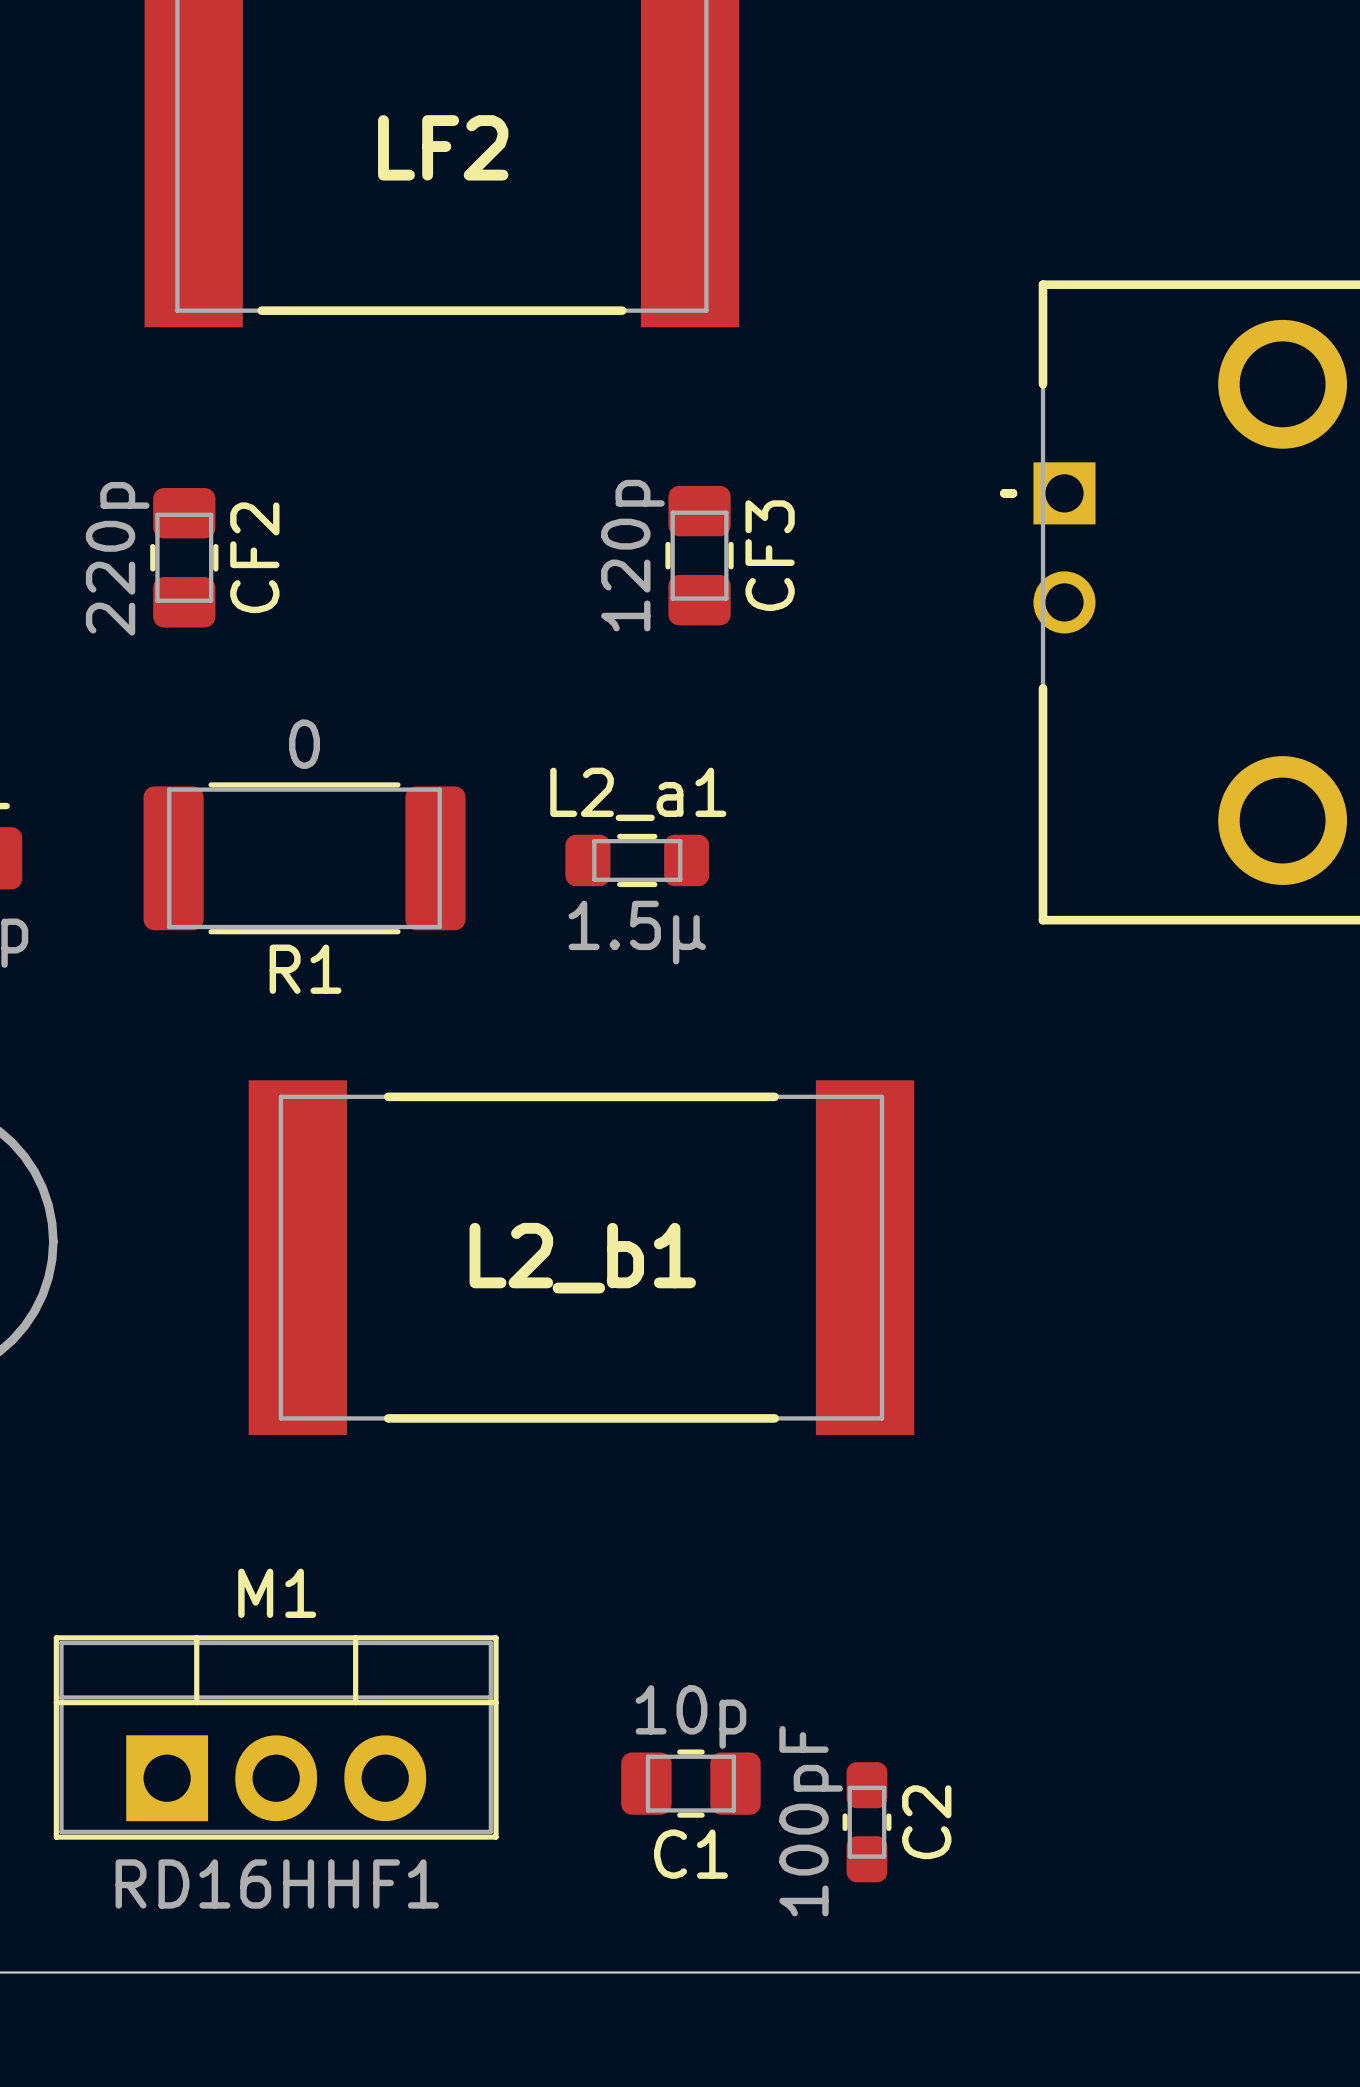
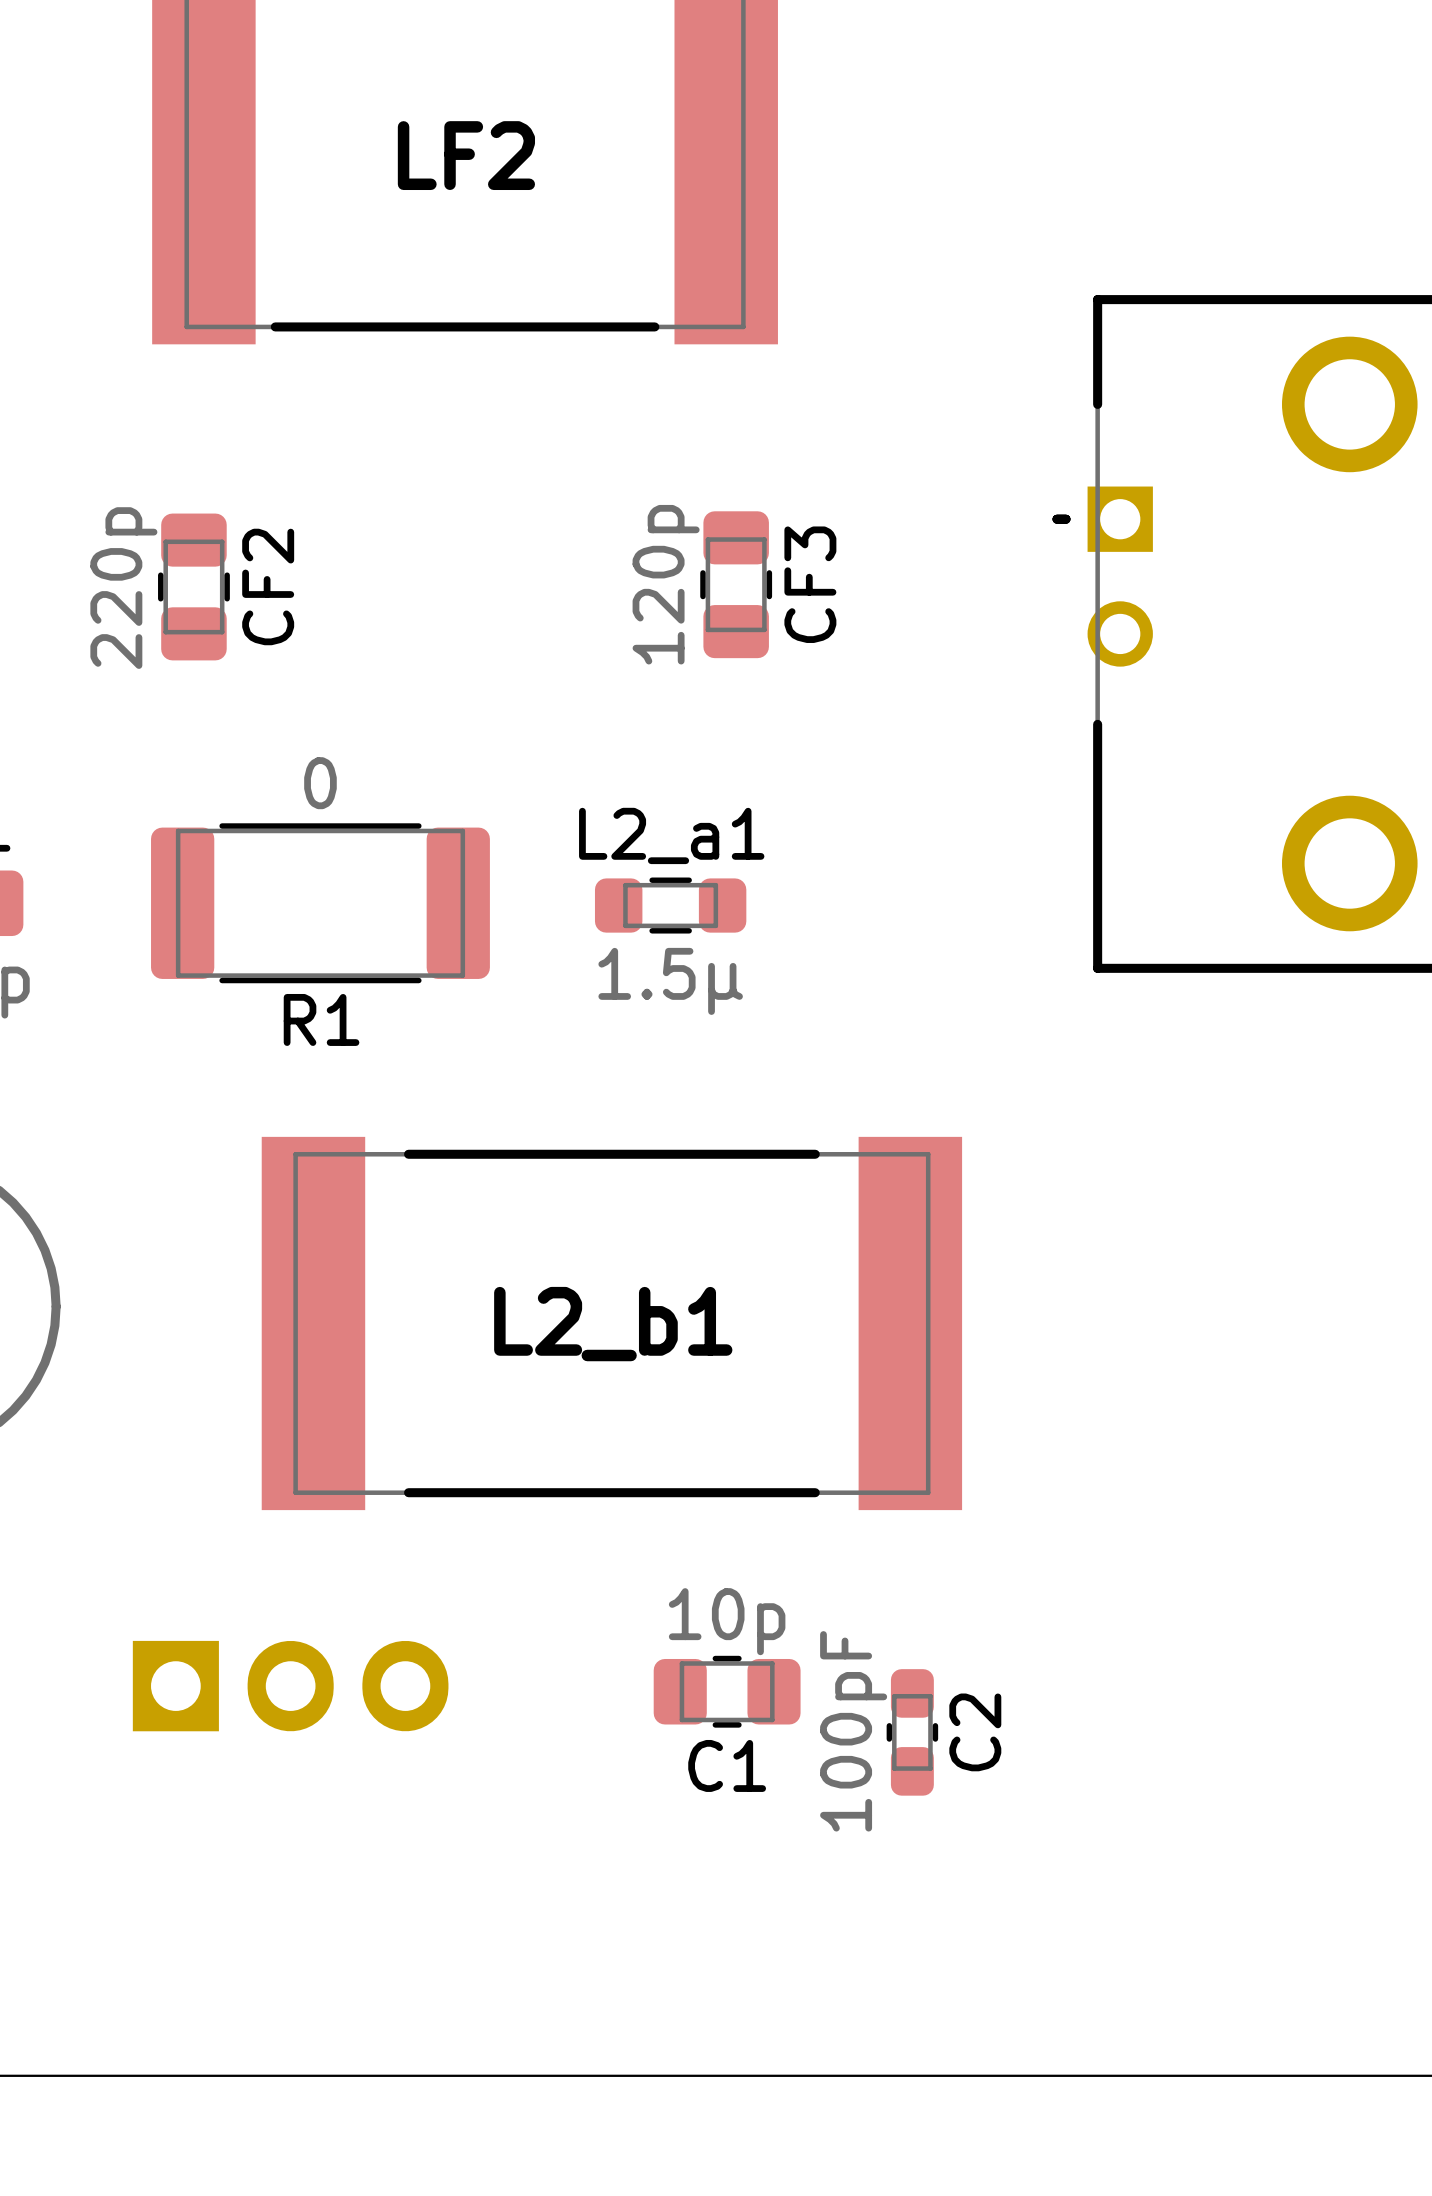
M1 side: top (276, 1737) -> bottom (290, 1686)
C1 position: (690, 1783) -> (727, 1691)
C2 position: (866, 1822) -> (912, 1732)

